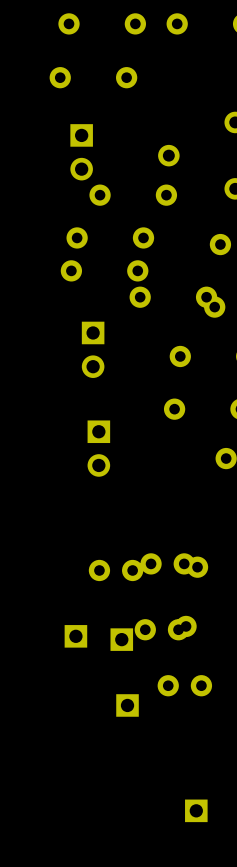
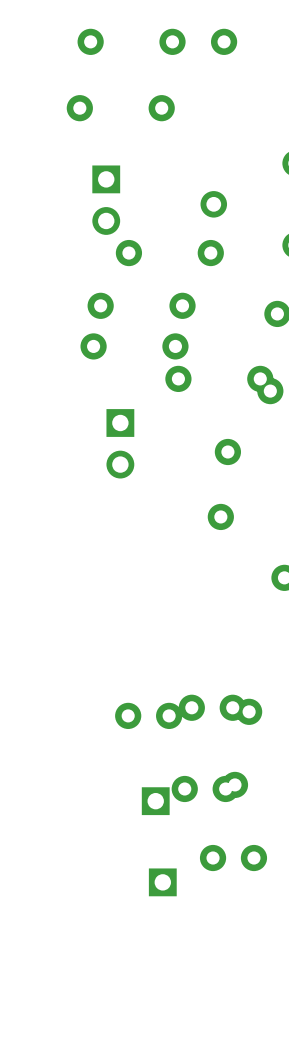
part: (98, 448) -> none
part: (75, 636) -> none
part: (196, 810) -> none

